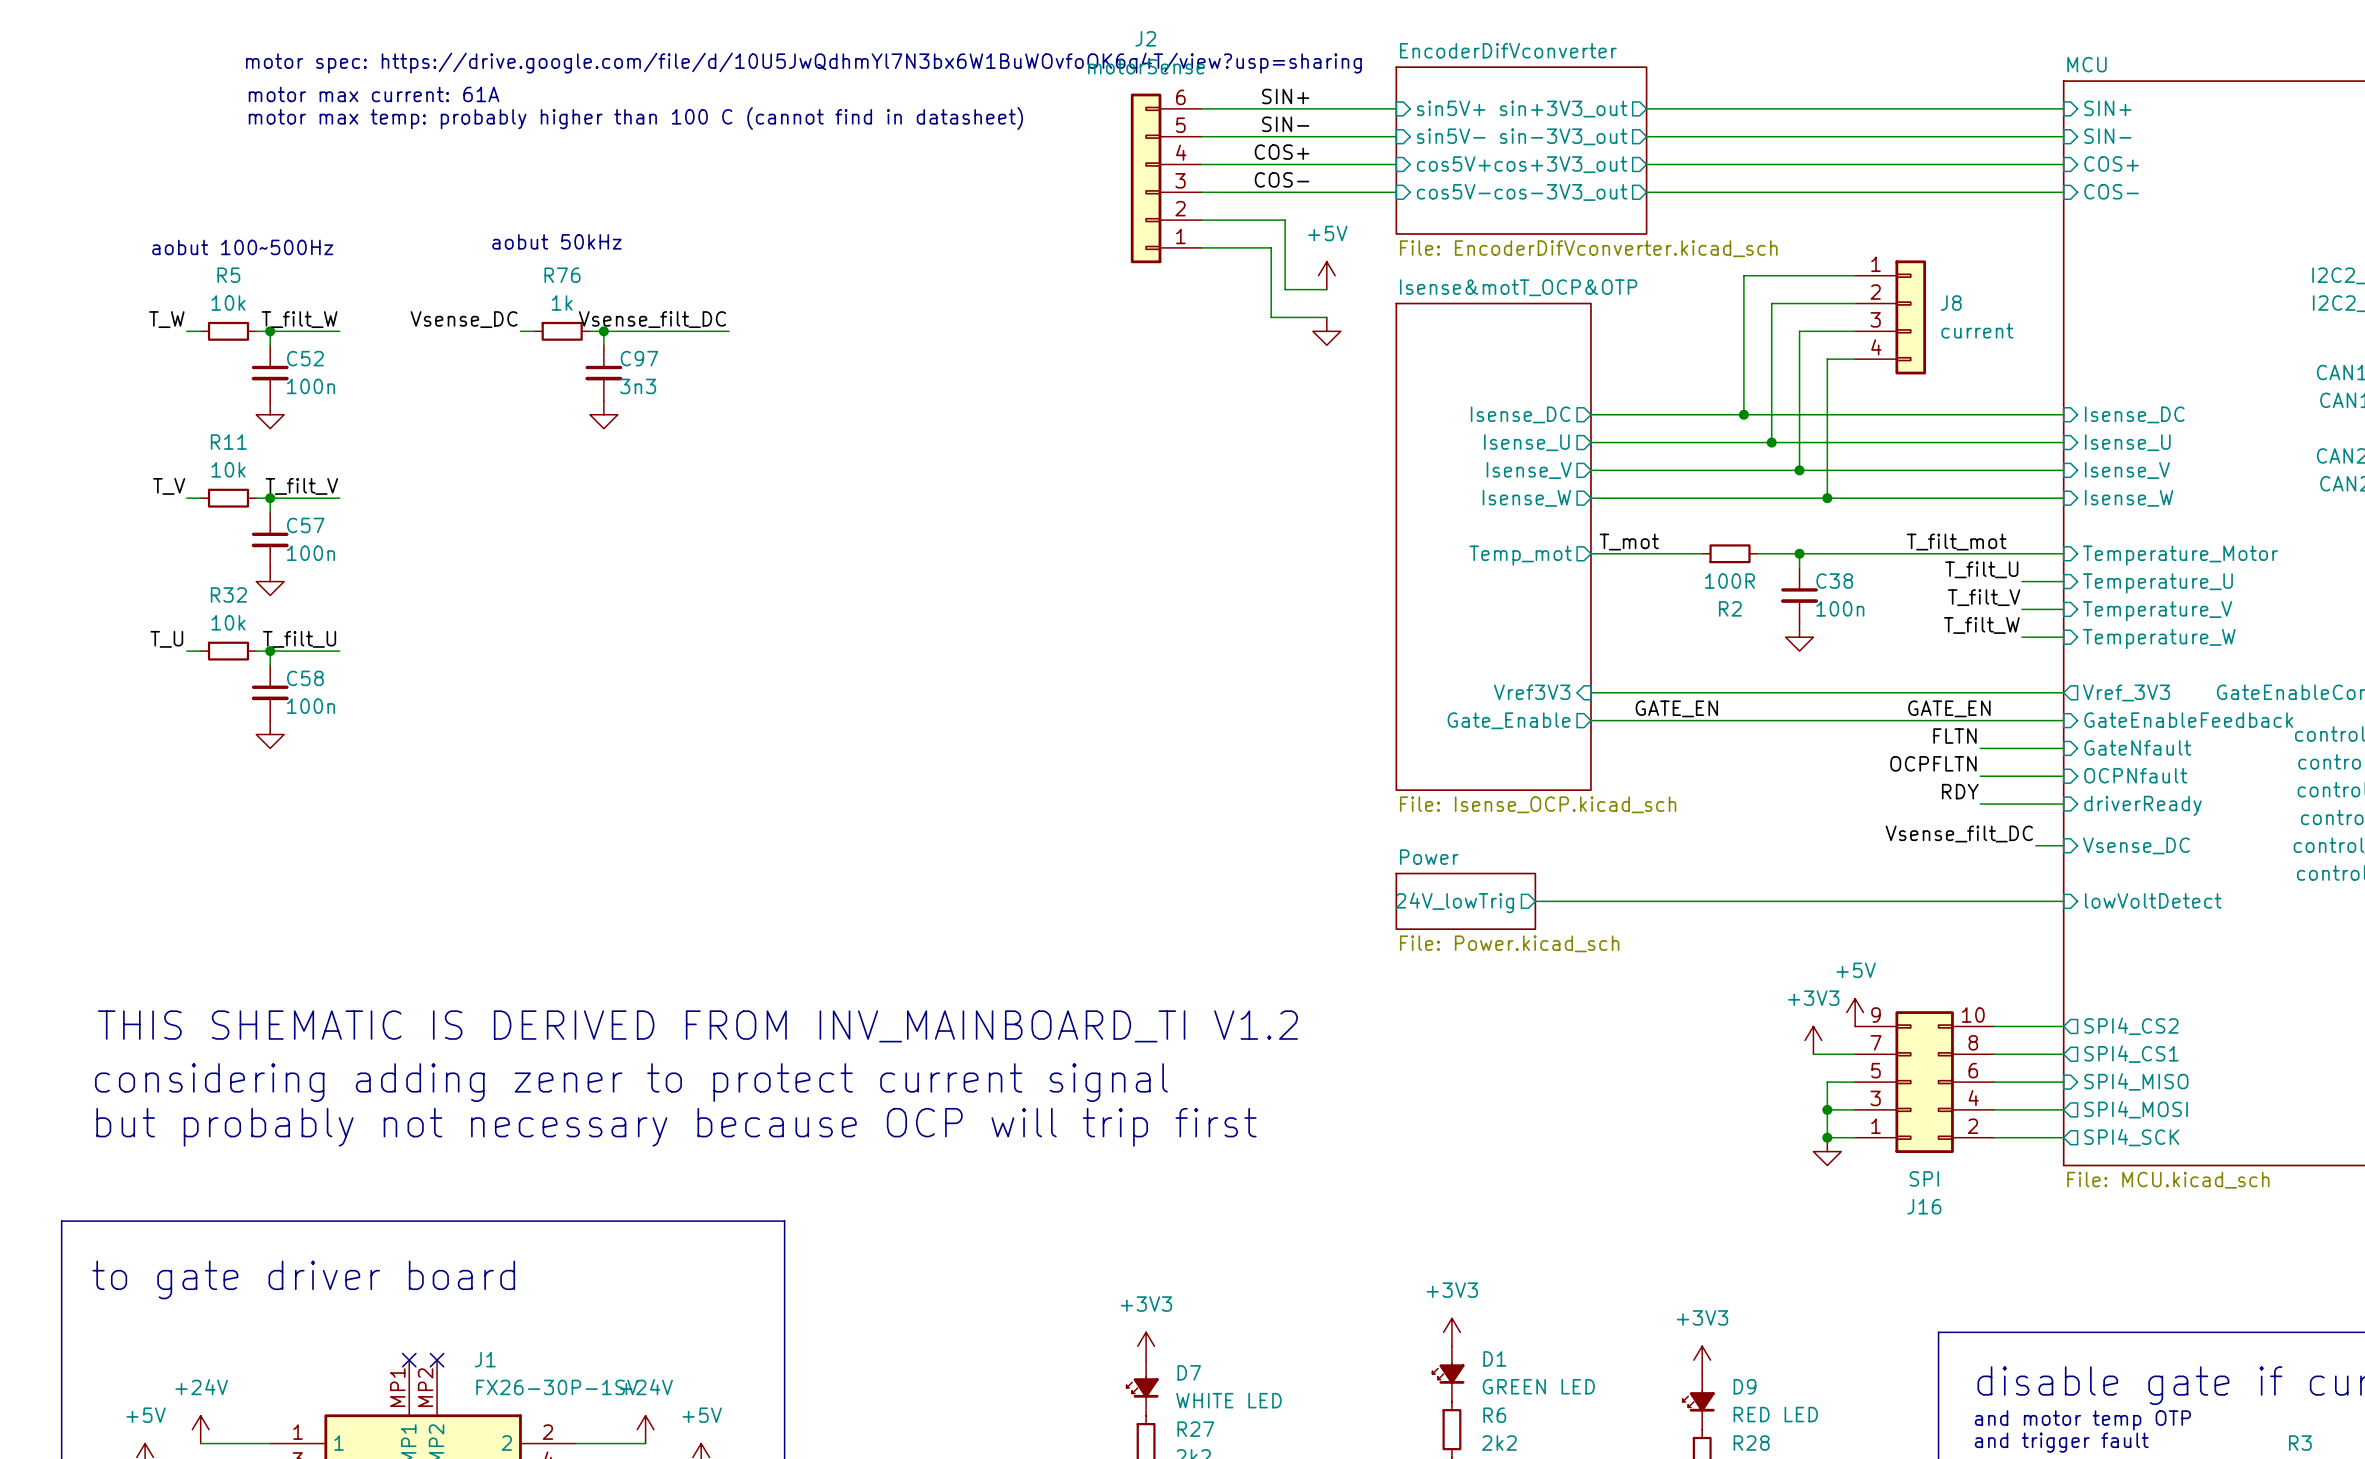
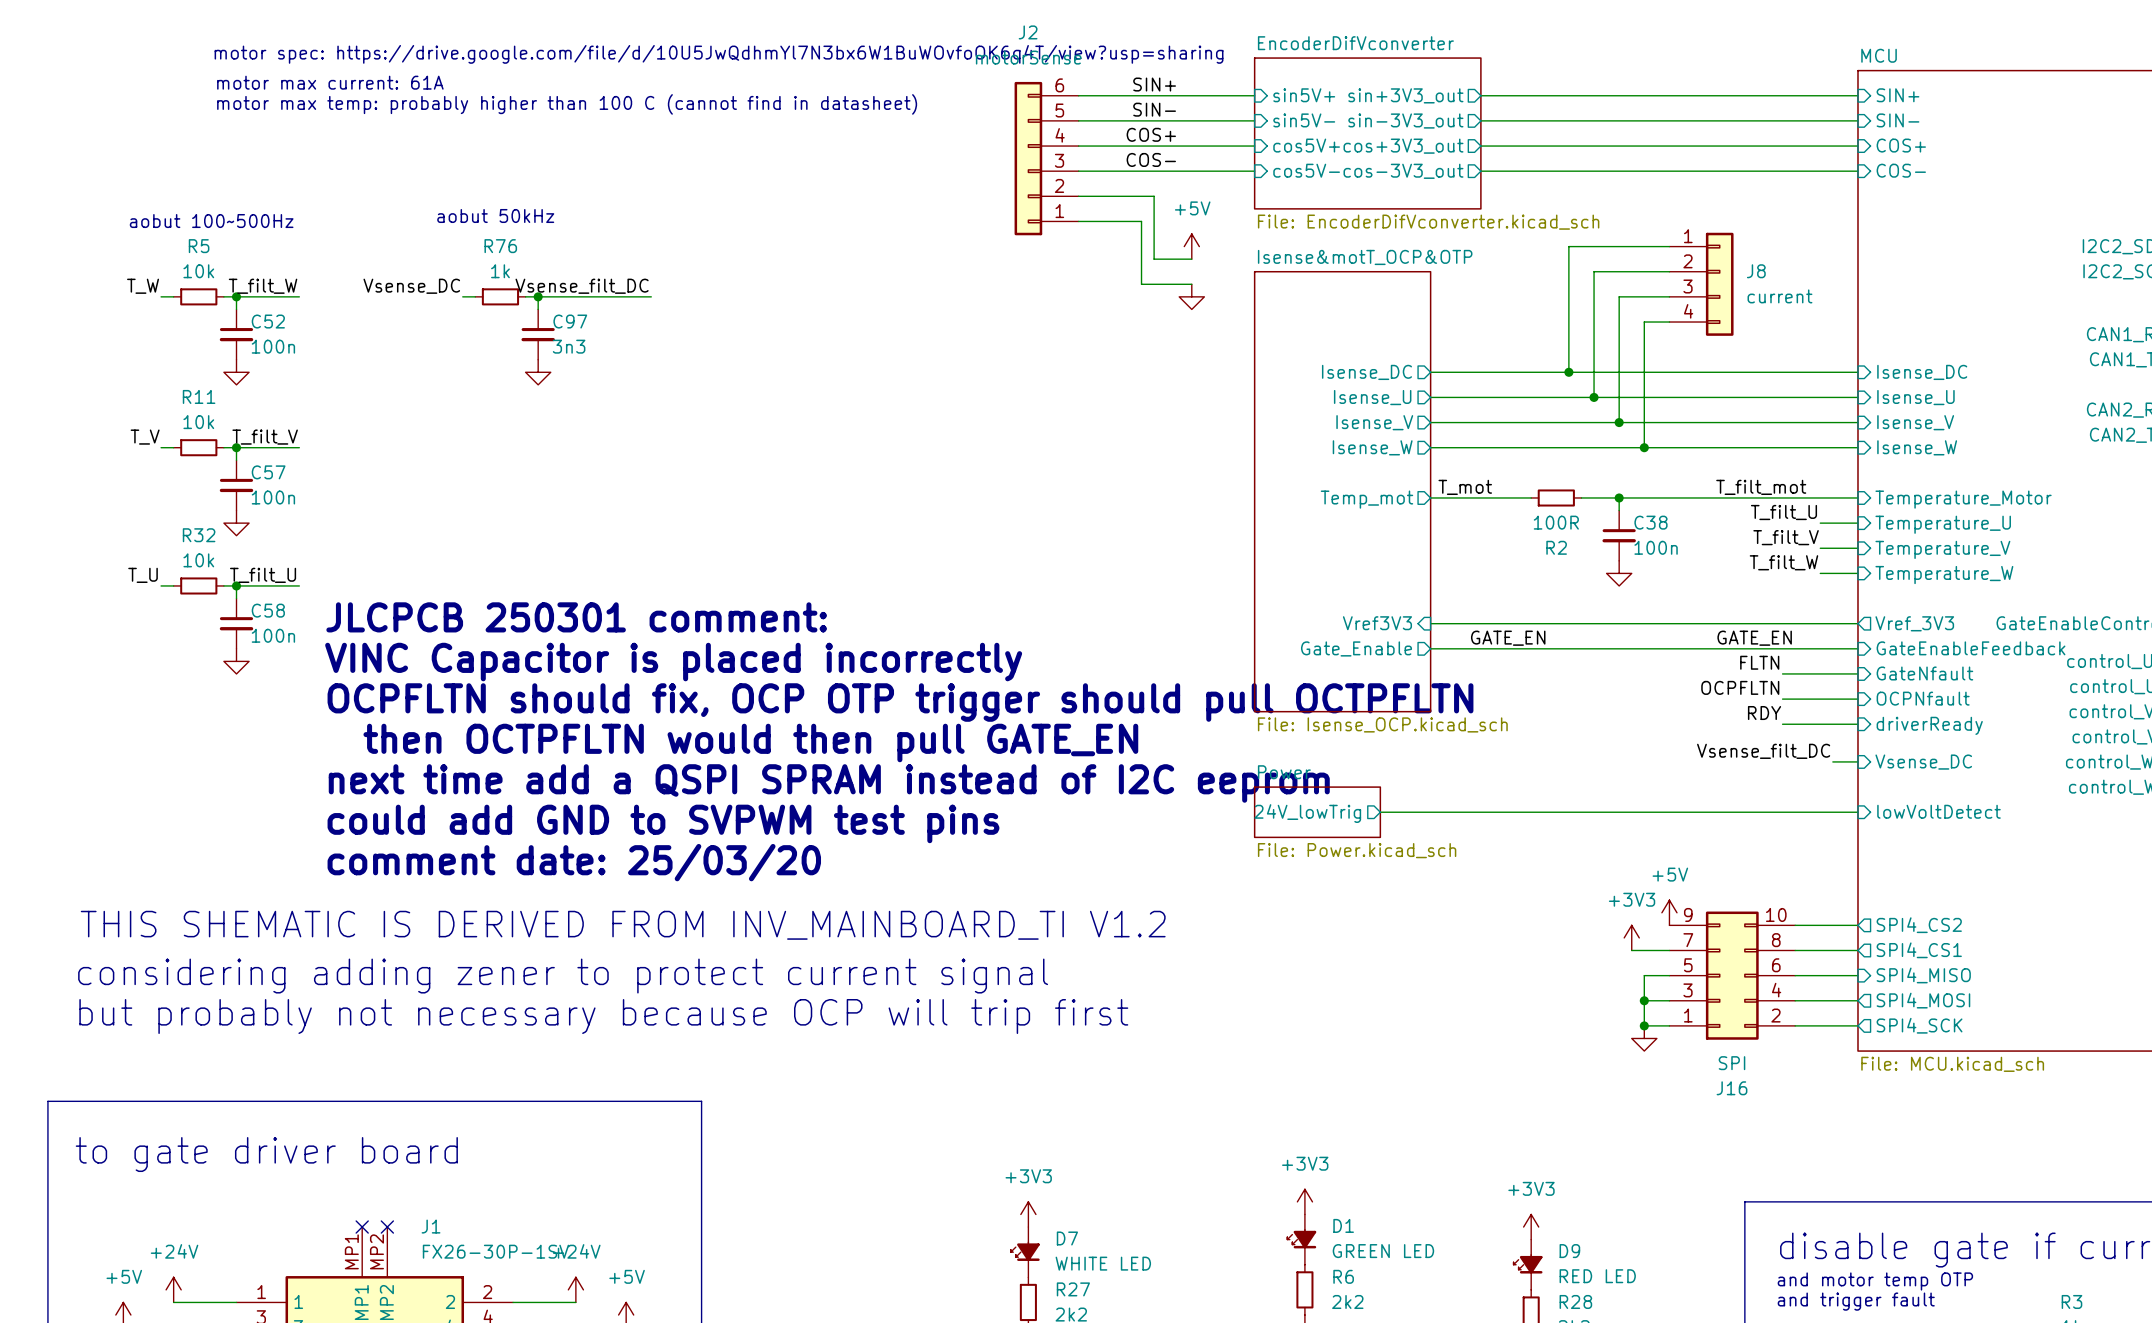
text: none -> JLCPCB 250301 comment: (576, 617)
text: none -> VINC Capacitor is placed incorrectly (673, 662)
text: none -> OCPFLTN should fix, OCP OTP trigger should pull OCTPFLTN (900, 702)
text: none -> then OCTPFLTN would then pull GATE_EN (750, 742)
text: none -> next time add a QSPI SPRAM instead of I2C eeprom (829, 783)
text: none -> could add GND to SVPWM test pins (663, 823)
text: none -> comment date: 25/03/20 (574, 862)

